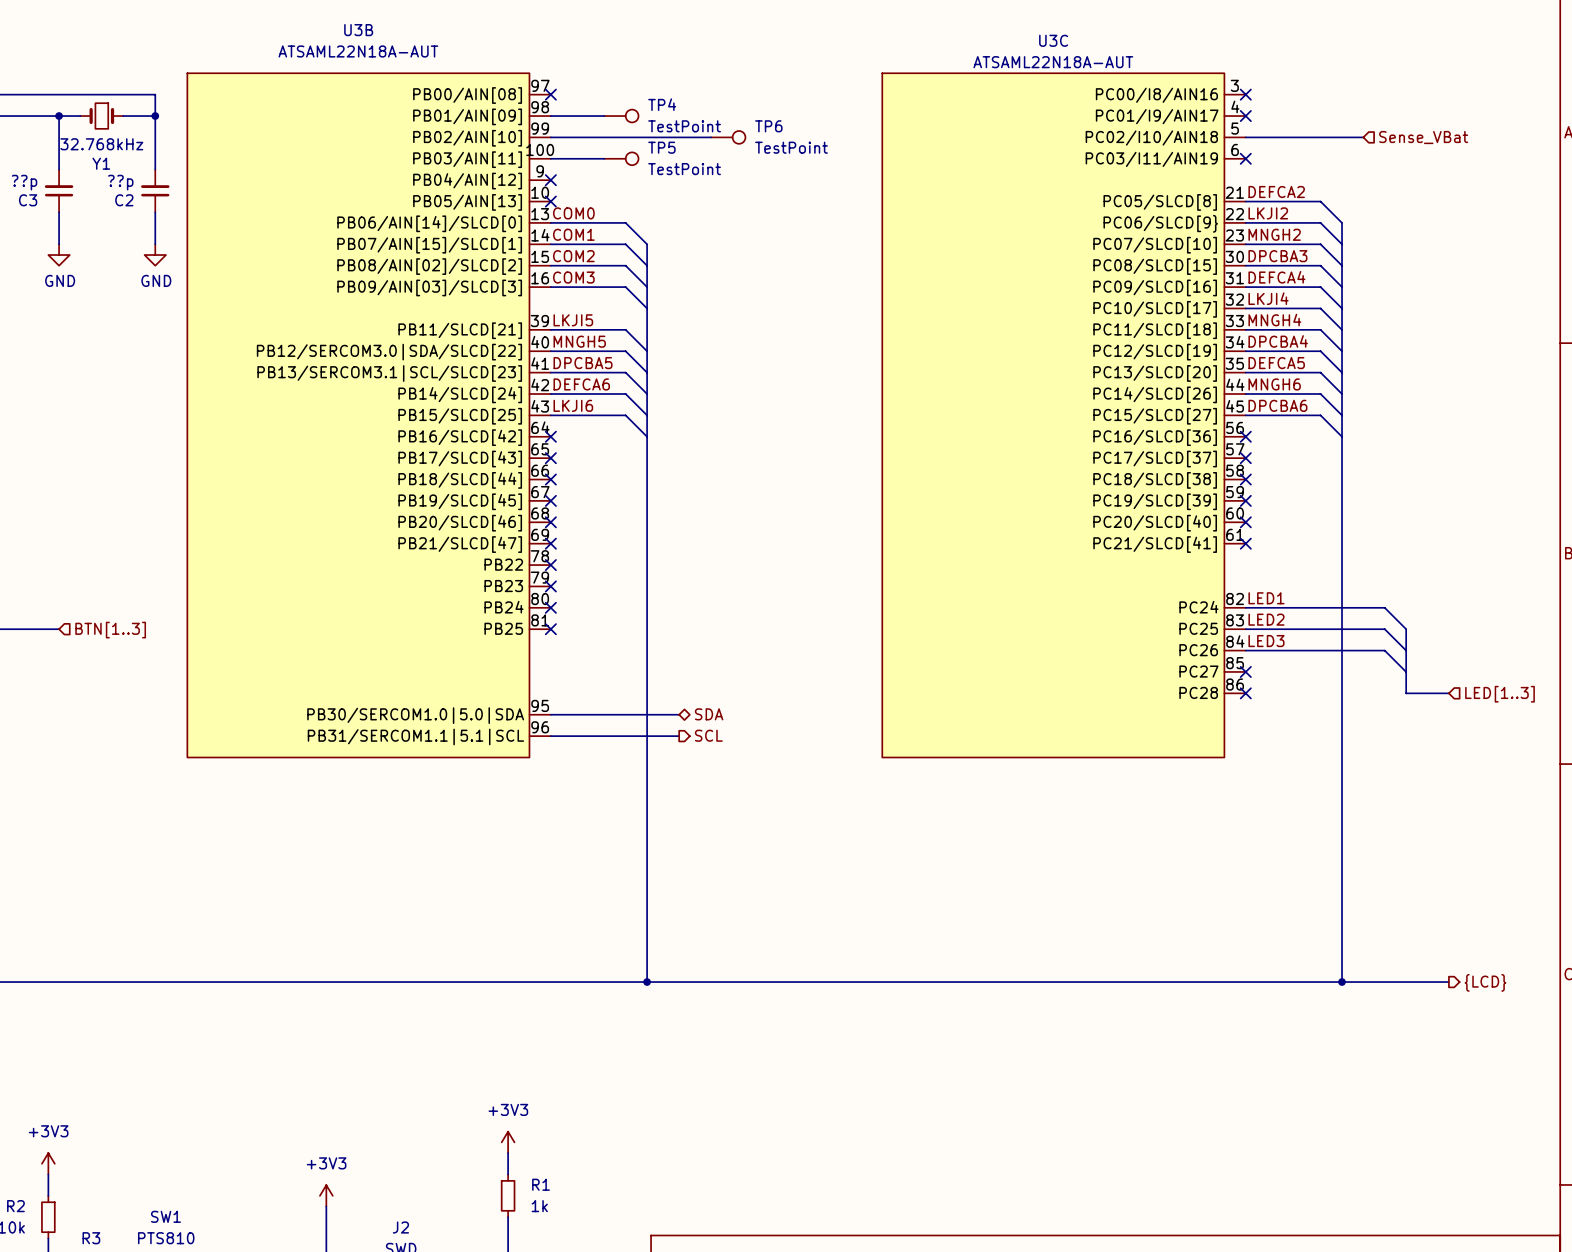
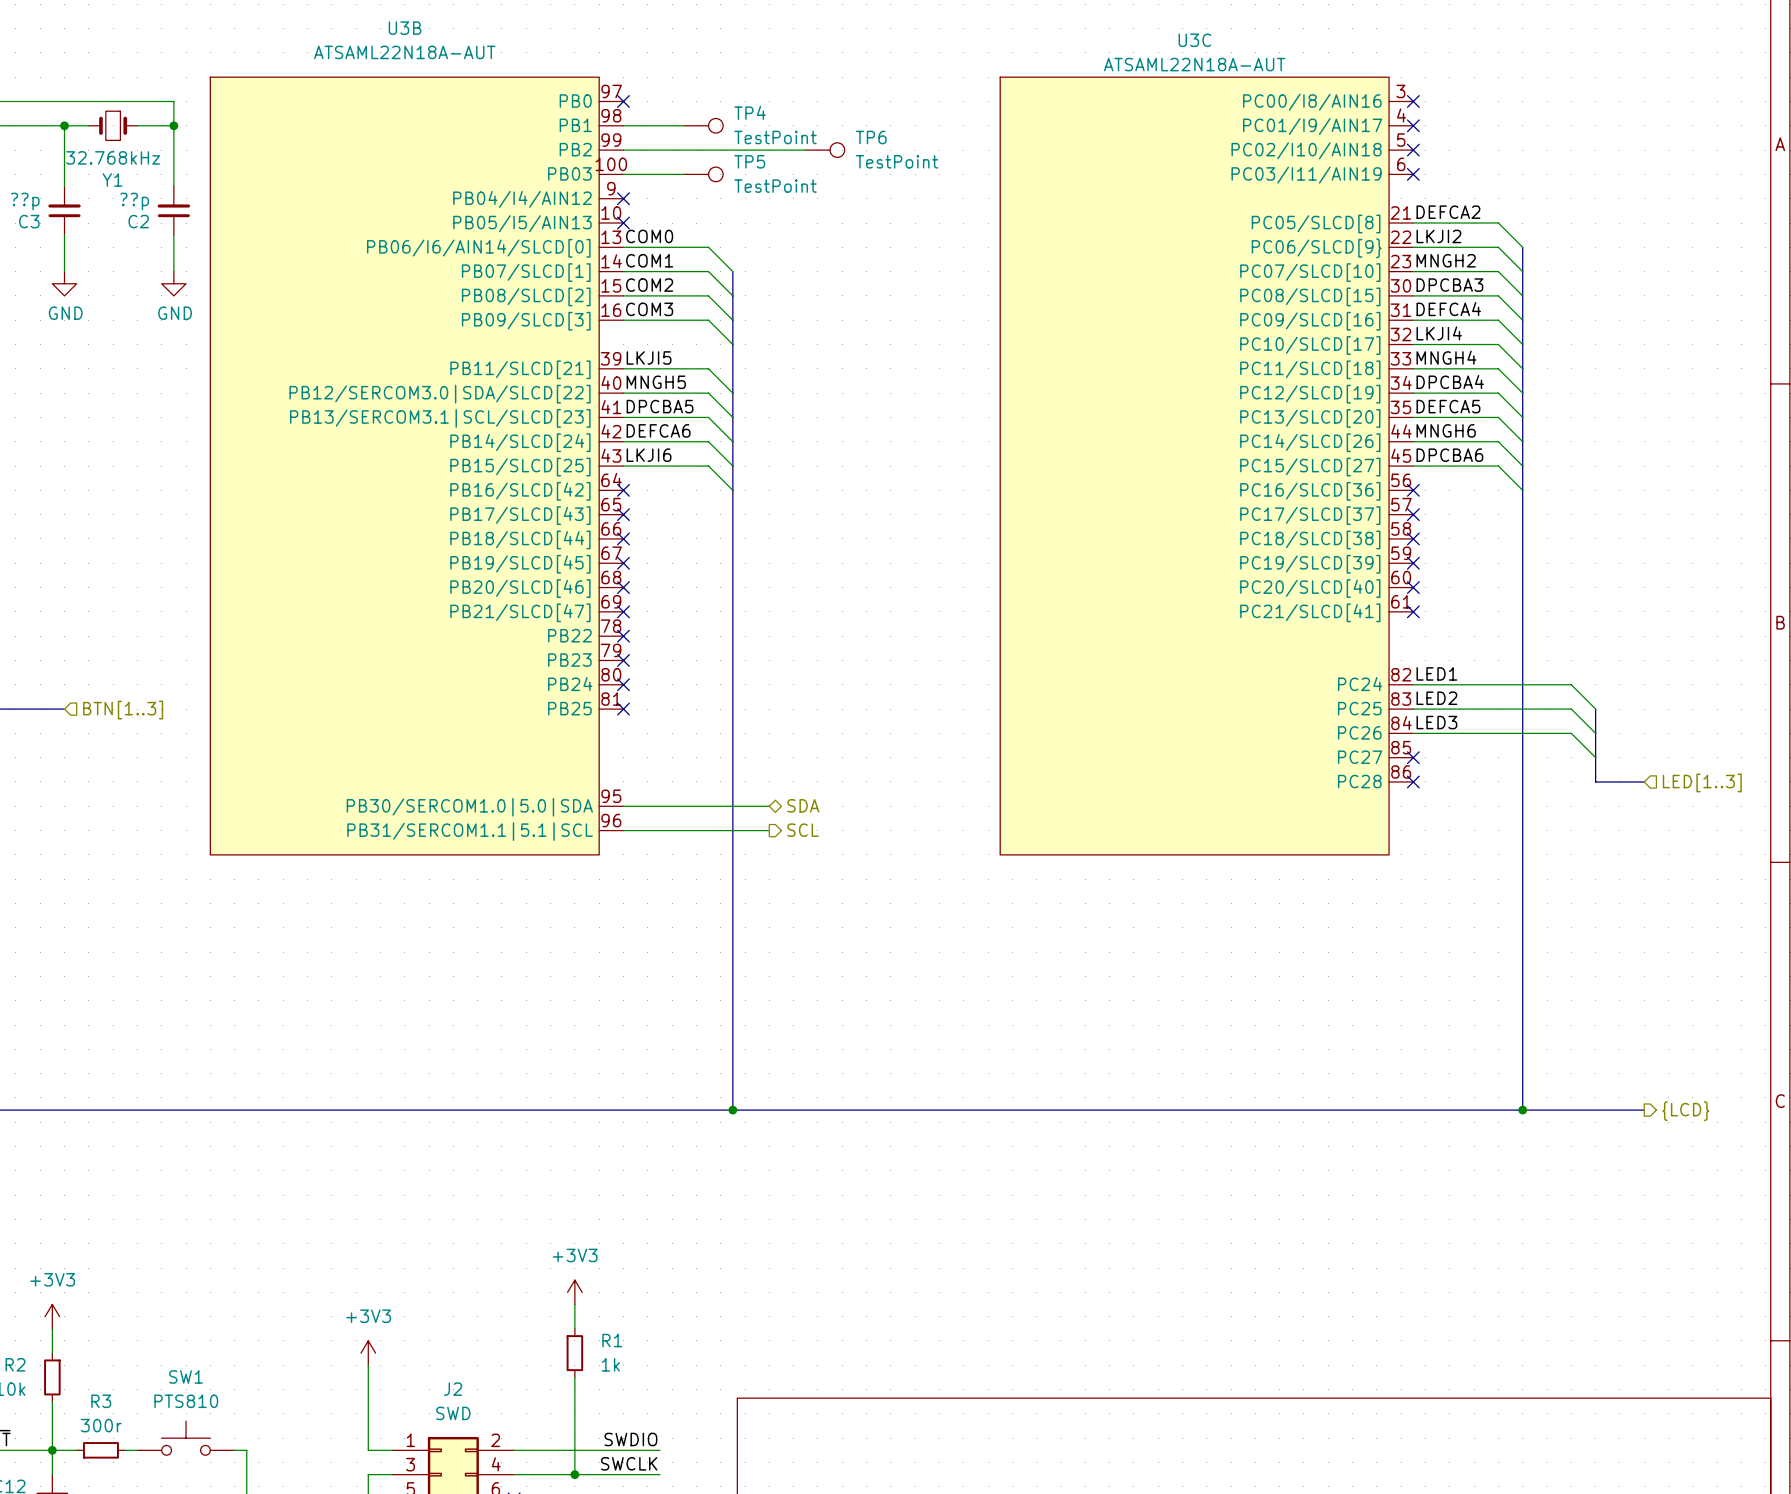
U3B symbol: [187, 73, 551, 758] -> [210, 77, 624, 855]
wire: (1245, 137) (1363, 137) -> none
no-connect mark: none -> (1413, 150)
hierarchical label: Sense_VBat (1423, 137) -> none

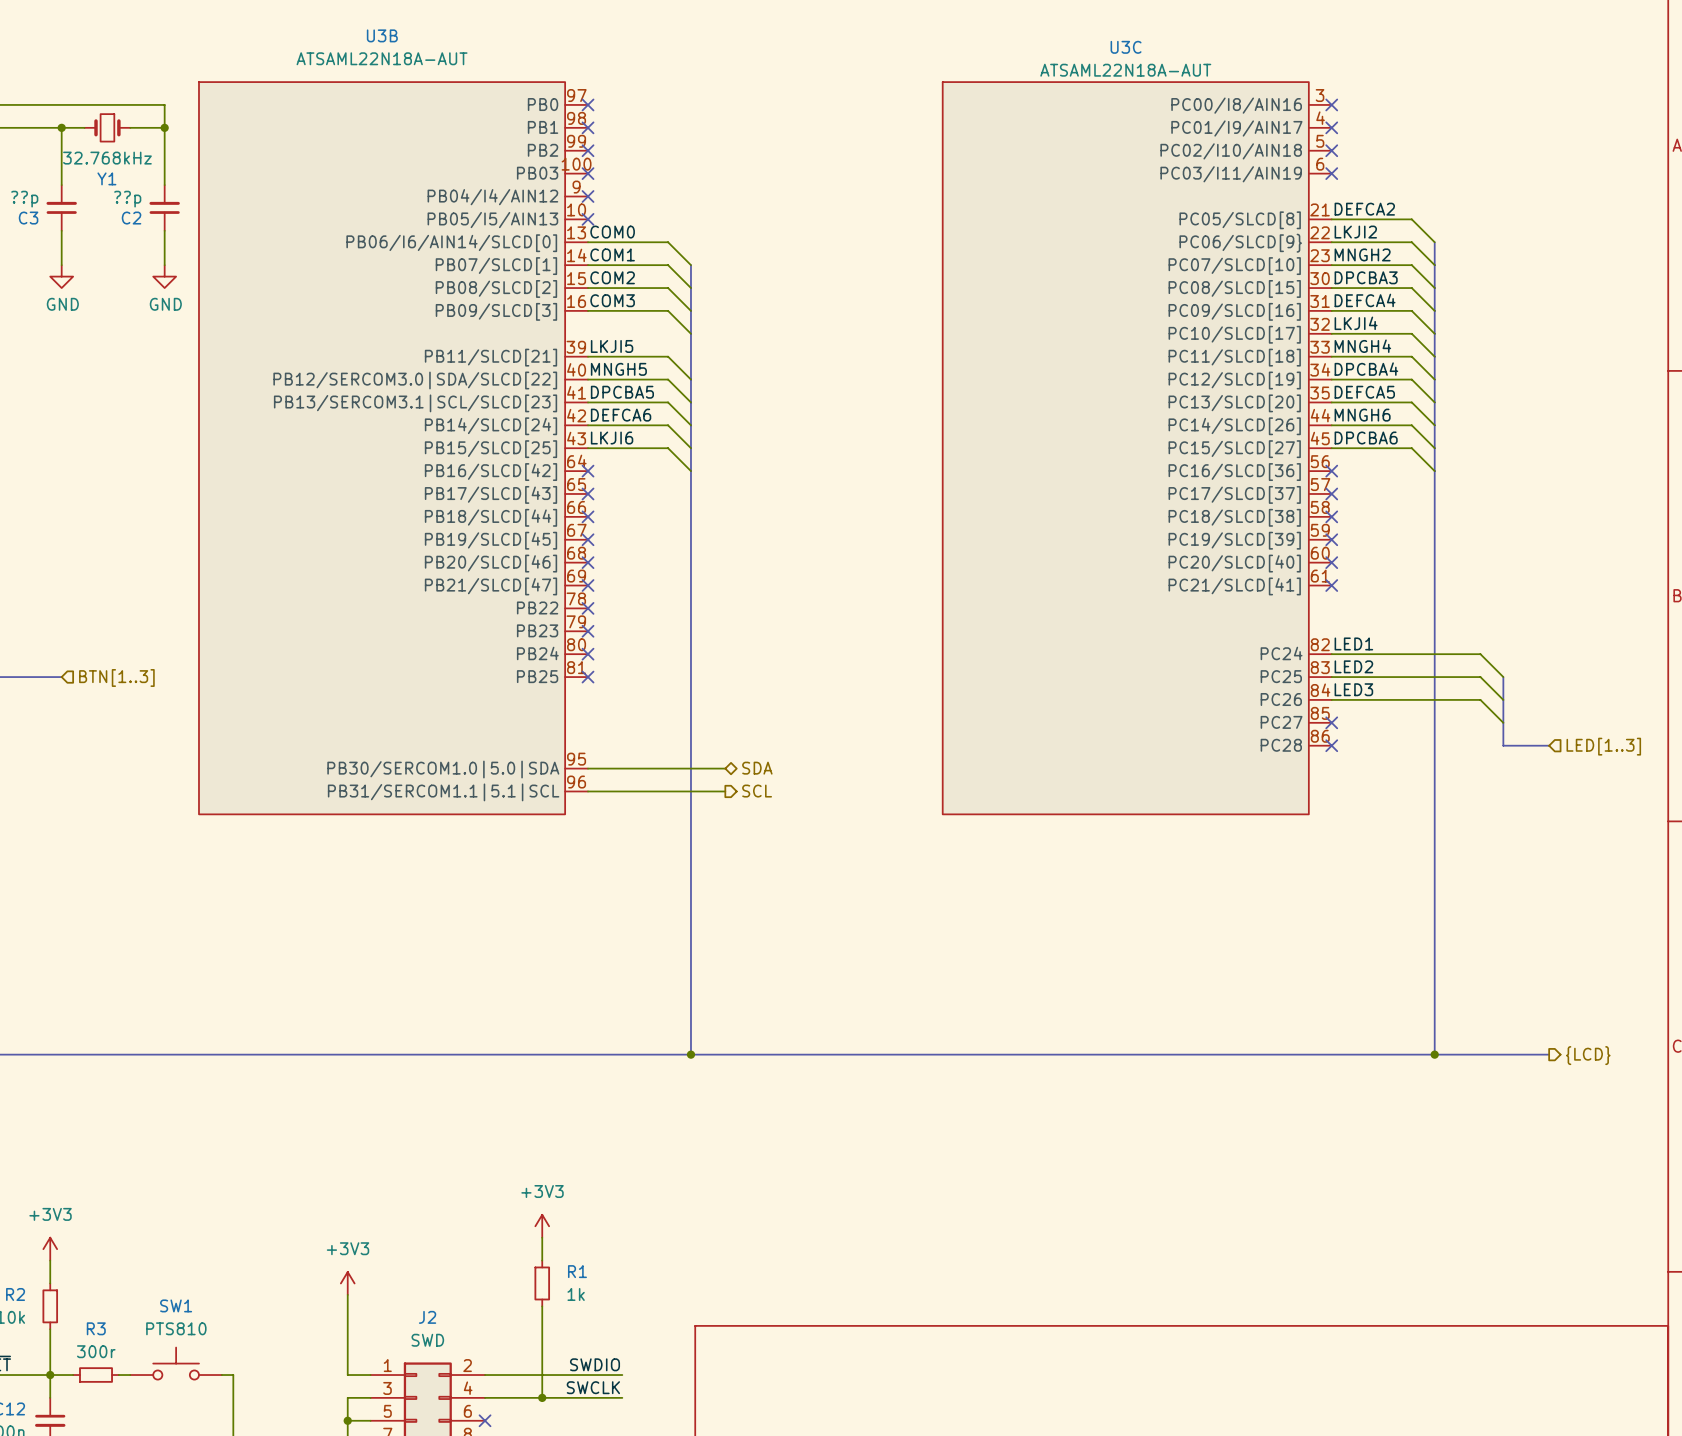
wire: (623, 125) (684, 125) -> none
no-connect mark: none -> (588, 127)
TP4: TestPoint (703, 125) -> none
wire: (623, 150) (805, 150) -> none
no-connect mark: none -> (588, 150)
TP6: TestPoint (825, 150) -> none
wire: (623, 174) (684, 174) -> none
no-connect mark: none -> (588, 173)
TP5: TestPoint (703, 174) -> none

